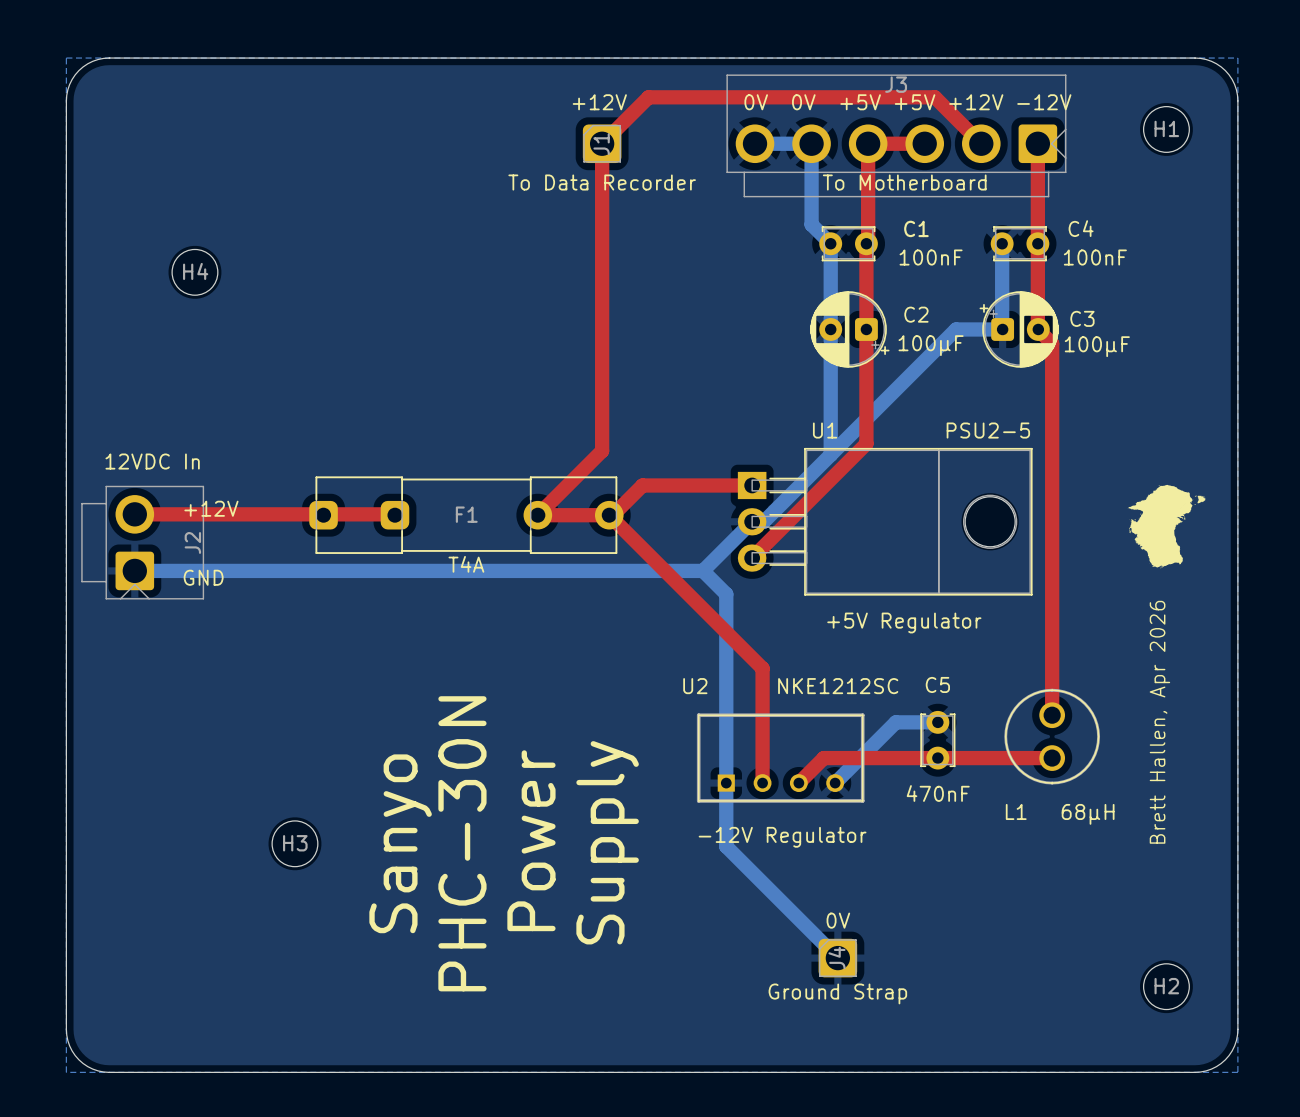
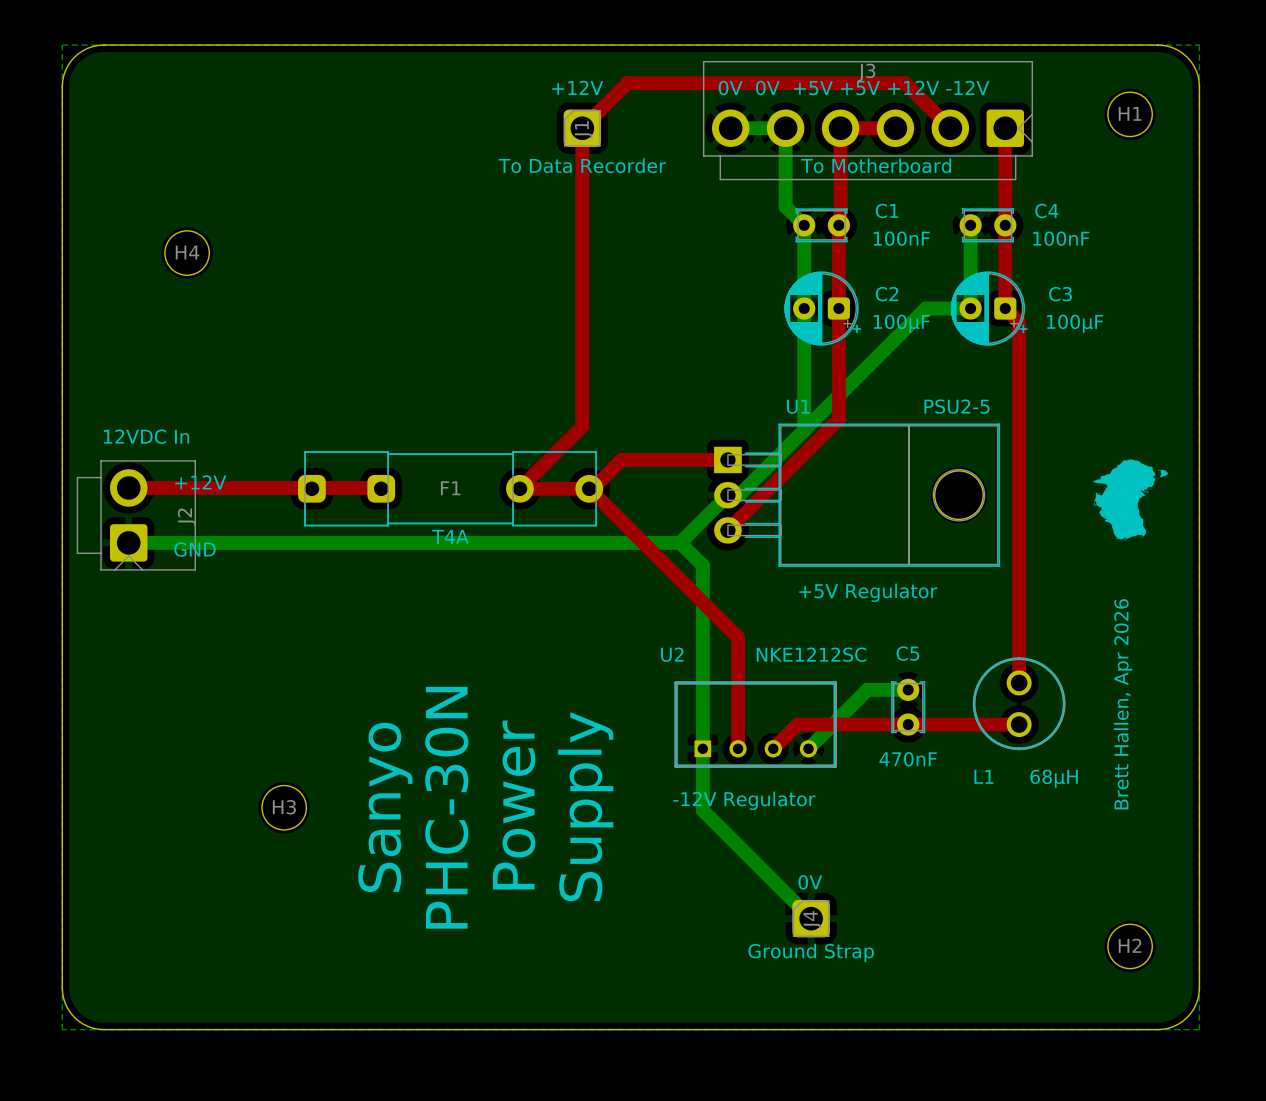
C3 rotation: 0° (1019, 329) -> 180° (989, 308)

